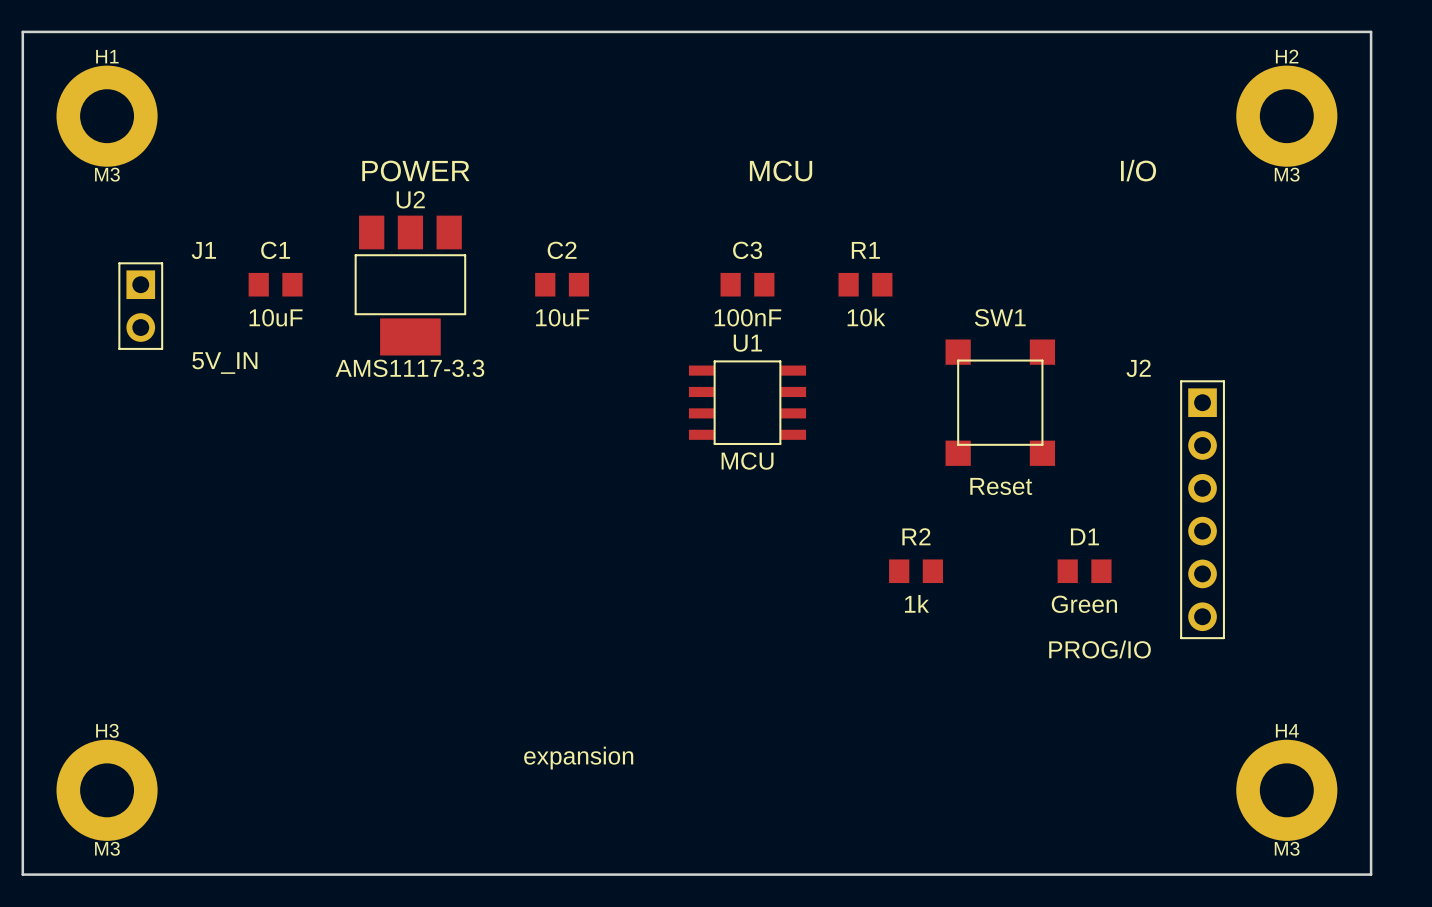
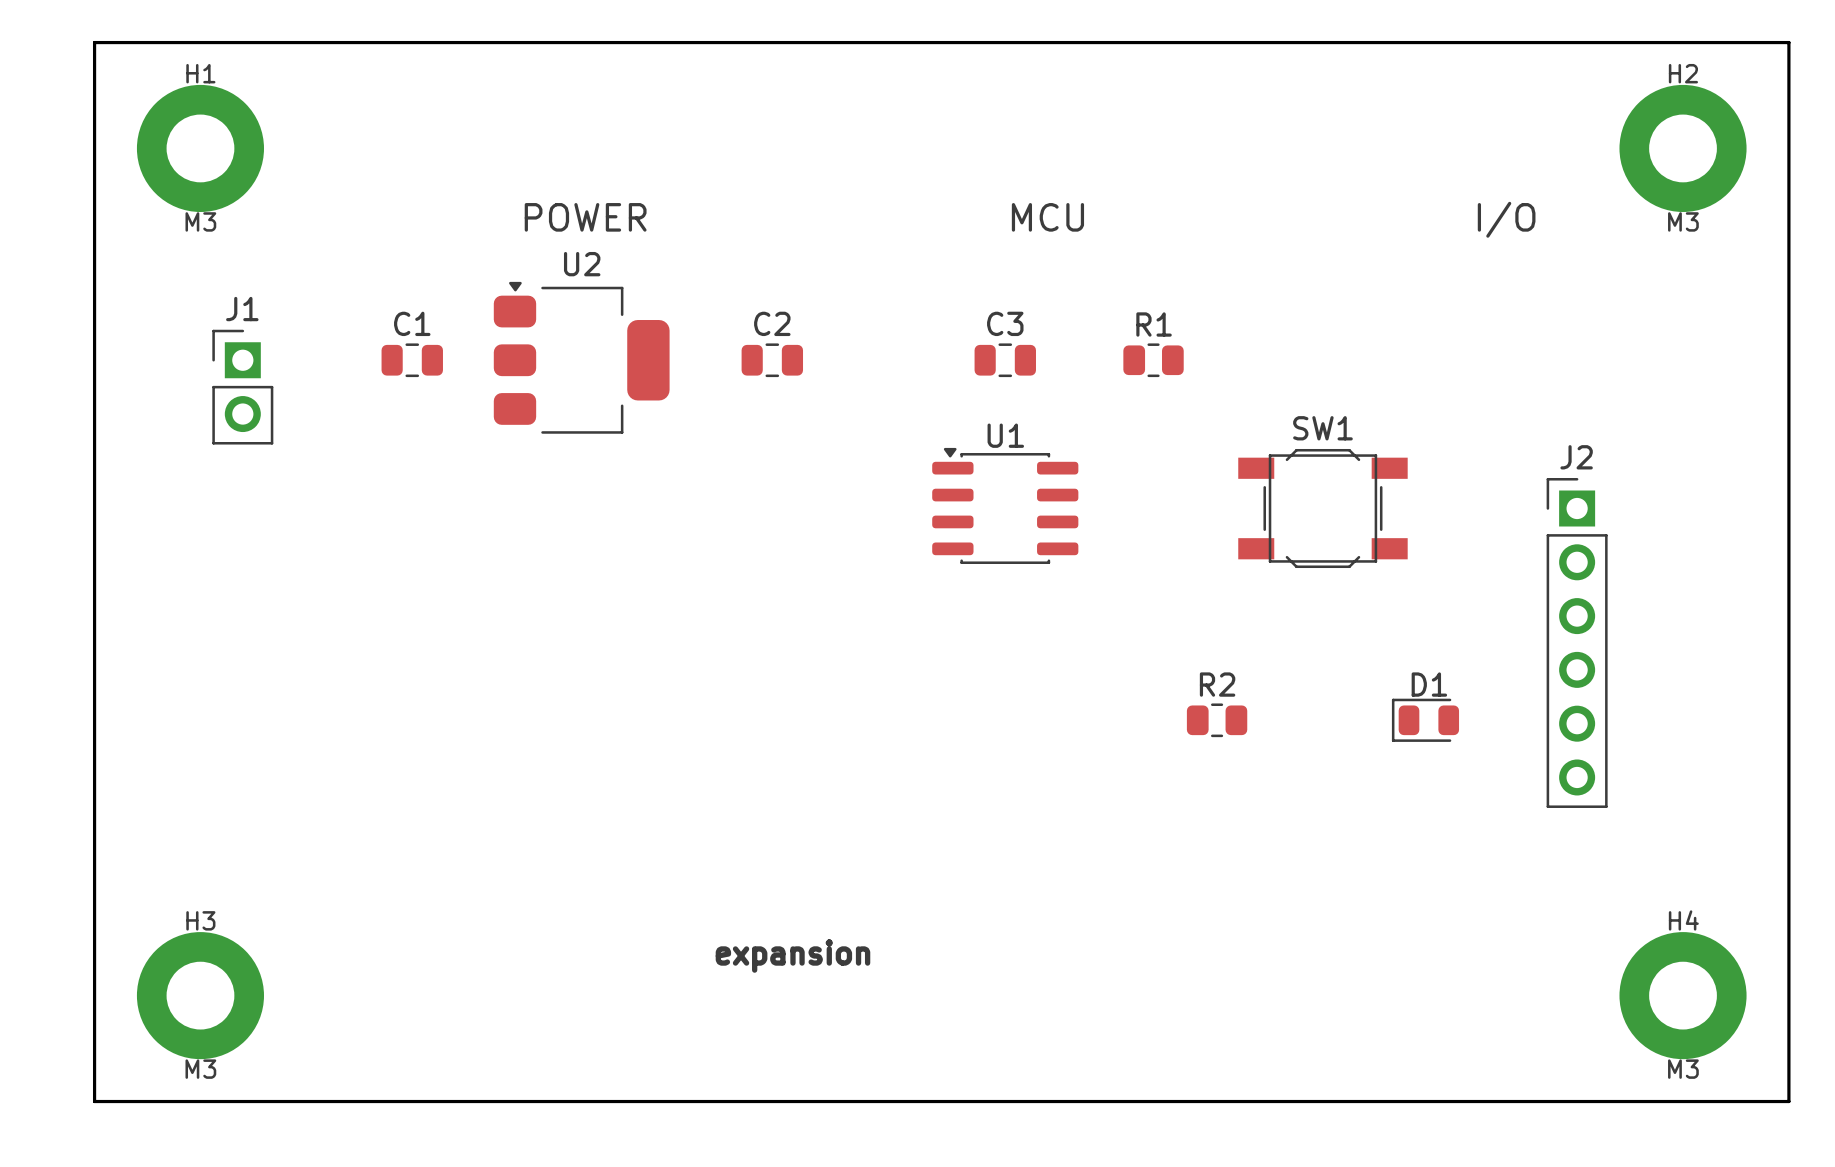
U2 footprint: [359, 215, 462, 356] -> [493, 281, 670, 434]
J1 name position: J1 (203, 250) -> J1 (242, 309)
line: (355, 255) (465, 255) (465, 314) (355, 314) (355, 255) -> none
line: (119, 263) (162, 263) (162, 348) (119, 348) (119, 263) -> none
J1 footprint: [126, 270, 156, 342] -> [212, 329, 274, 445]
C1 footprint: [248, 272, 303, 297] -> [381, 343, 443, 378]
C2 footprint: [535, 272, 590, 297] -> [741, 343, 804, 378]
C3 footprint: [720, 272, 775, 297] -> [974, 343, 1036, 378]
R1 footprint: [838, 272, 893, 297] -> [1123, 343, 1184, 378]
C1 value: 10uF (276, 317) -> none
C2 value: 10uF (562, 317) -> none
C3 value: 100nF (747, 317) -> none
R1 value: 10k (866, 317) -> none
SW1 footprint: [945, 339, 1056, 466] -> [1238, 448, 1408, 569]
line: (714, 361) (780, 361) (780, 443) (714, 443) (714, 361) -> none
J1 value: 5V_IN (224, 363) -> none
U1 footprint: [688, 365, 807, 440] -> [932, 447, 1079, 564]
U2 value: AMS1117-3.3 (409, 368) -> none
J2 name position: J2 (1138, 368) -> J2 (1576, 457)
line: (1181, 381) (1223, 381) (1223, 638) (1181, 638) (1181, 381) -> none
J2 footprint: [1188, 388, 1217, 632] -> [1546, 478, 1608, 808]
U1 value: MCU (747, 461) -> none
SW1 value: Reset (1001, 486) -> none
R2 footprint: [889, 559, 944, 584] -> [1186, 703, 1248, 738]
D1 footprint: [1057, 559, 1112, 584] -> [1391, 698, 1460, 742]
R2 value: 1k (916, 603) -> none
D1 value: Green (1084, 604) -> none
J2 value: PROG/IO (1100, 649) -> none

